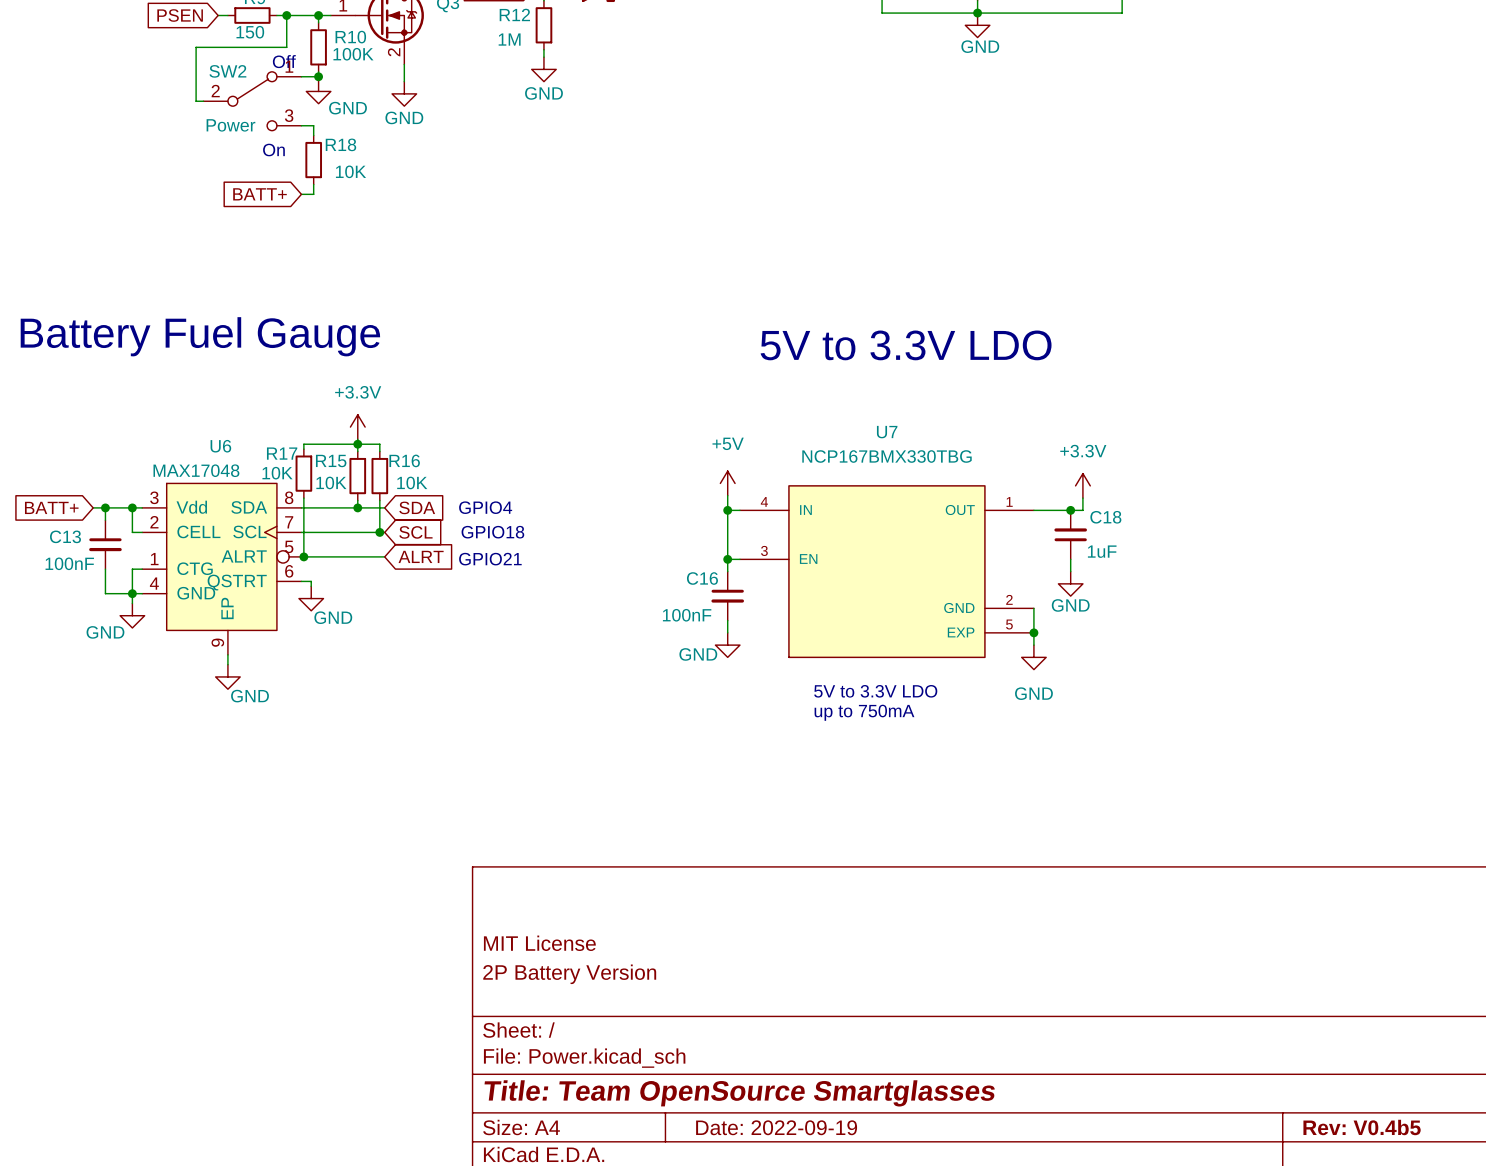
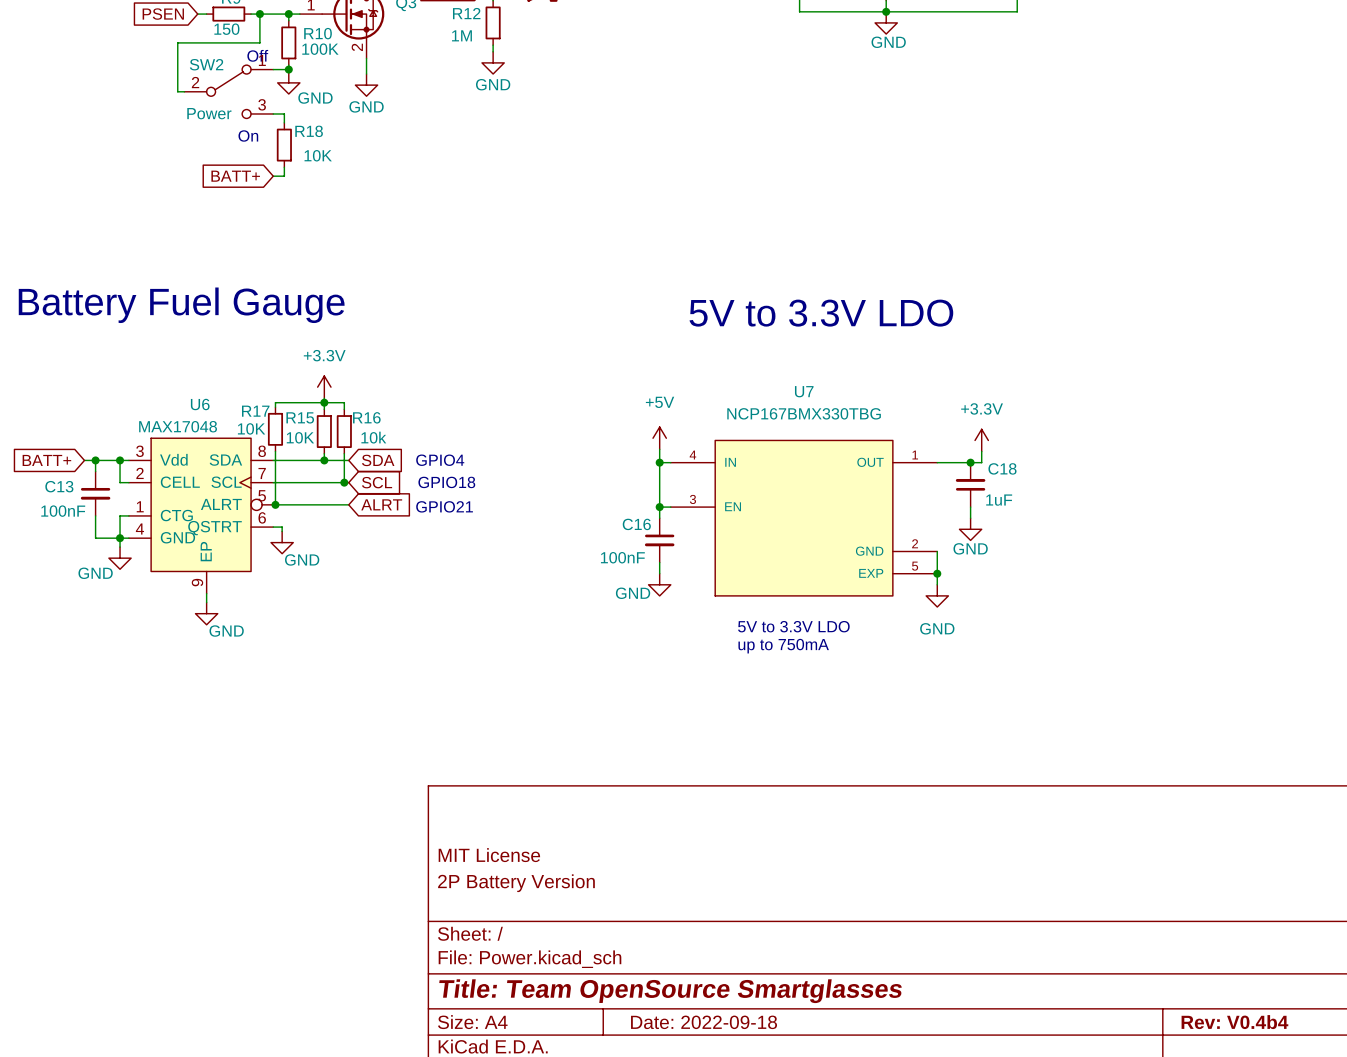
R16 value: 10K (412, 482) -> 10k (373, 437)
title block: Date: 2022-09-19 (776, 1127) -> Date: 2022-09-18 (704, 1022)
title block: Rev: V0.4b5 (1362, 1127) -> Rev: V0.4b4 (1234, 1022)

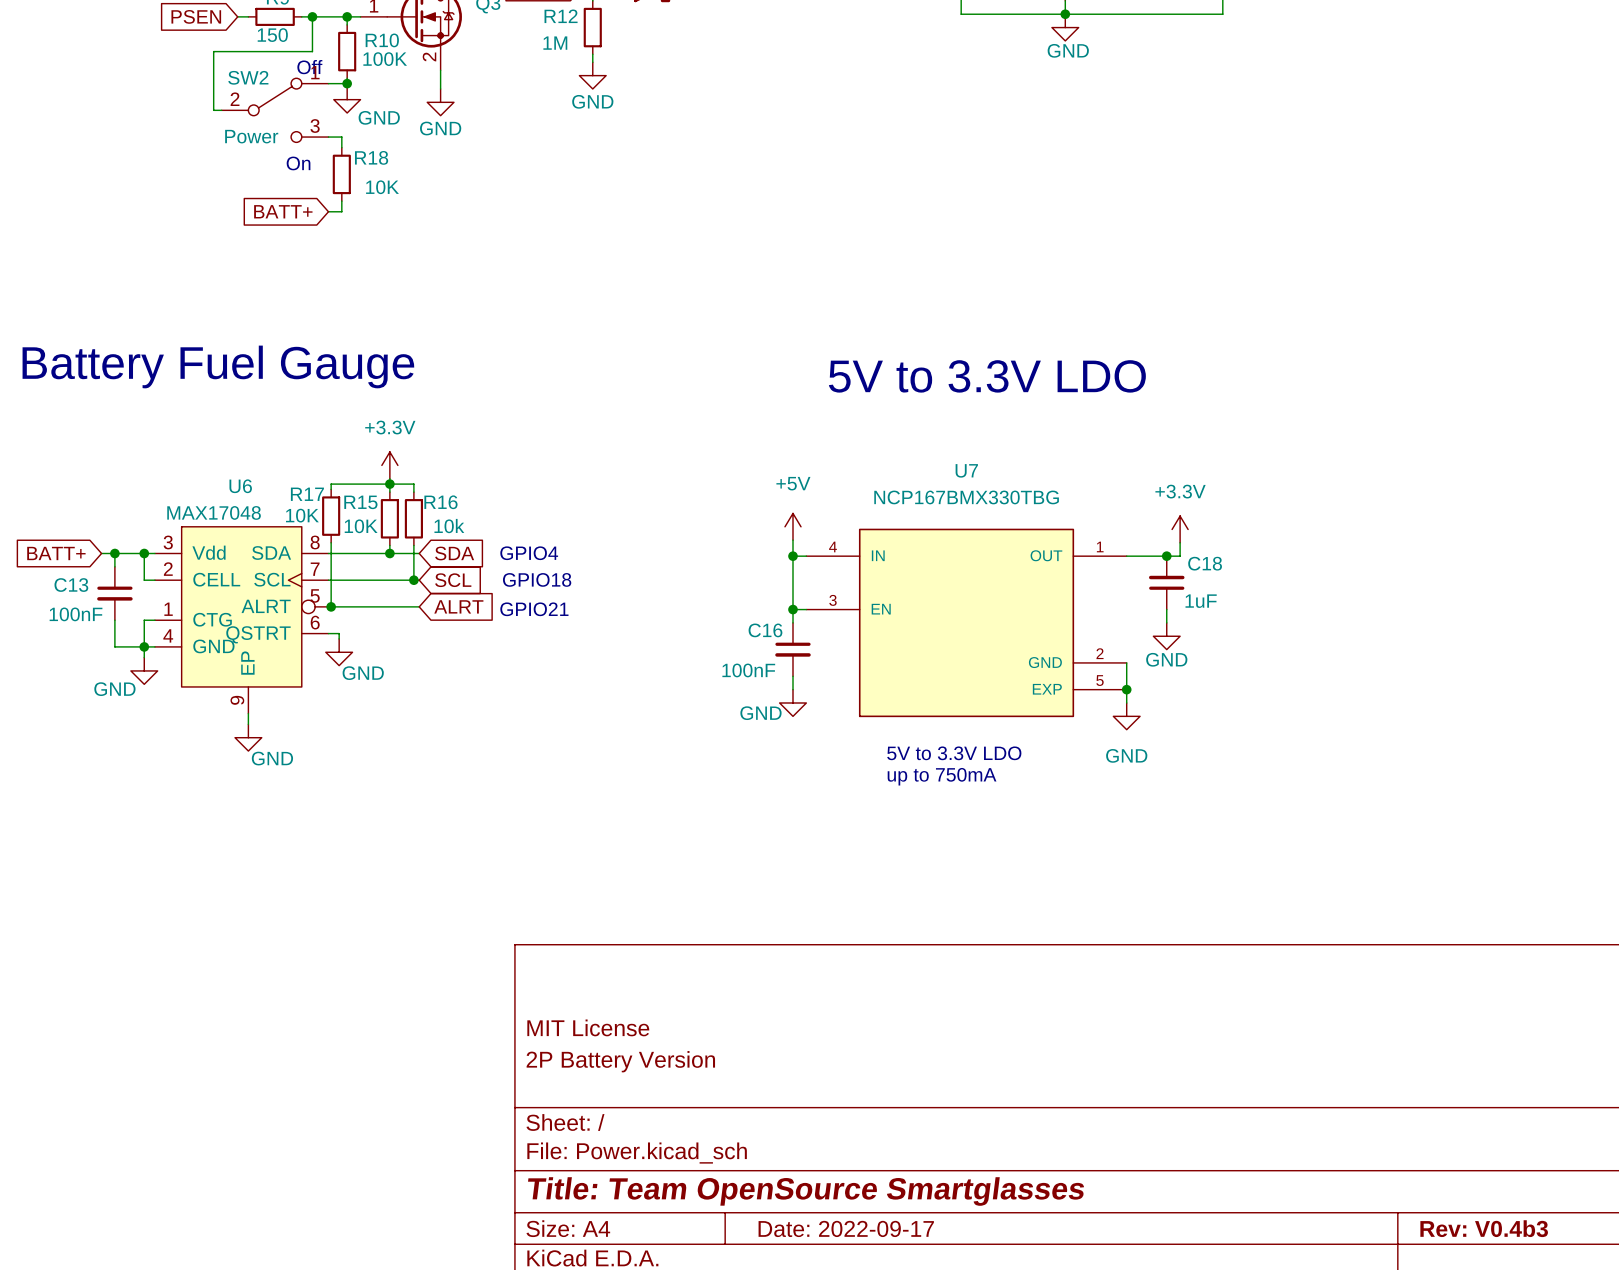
title block: Date: 2022-09-18 (704, 1022) -> Date: 2022-09-17 (846, 1228)
title block: Rev: V0.4b4 (1234, 1022) -> Rev: V0.4b3 (1484, 1228)

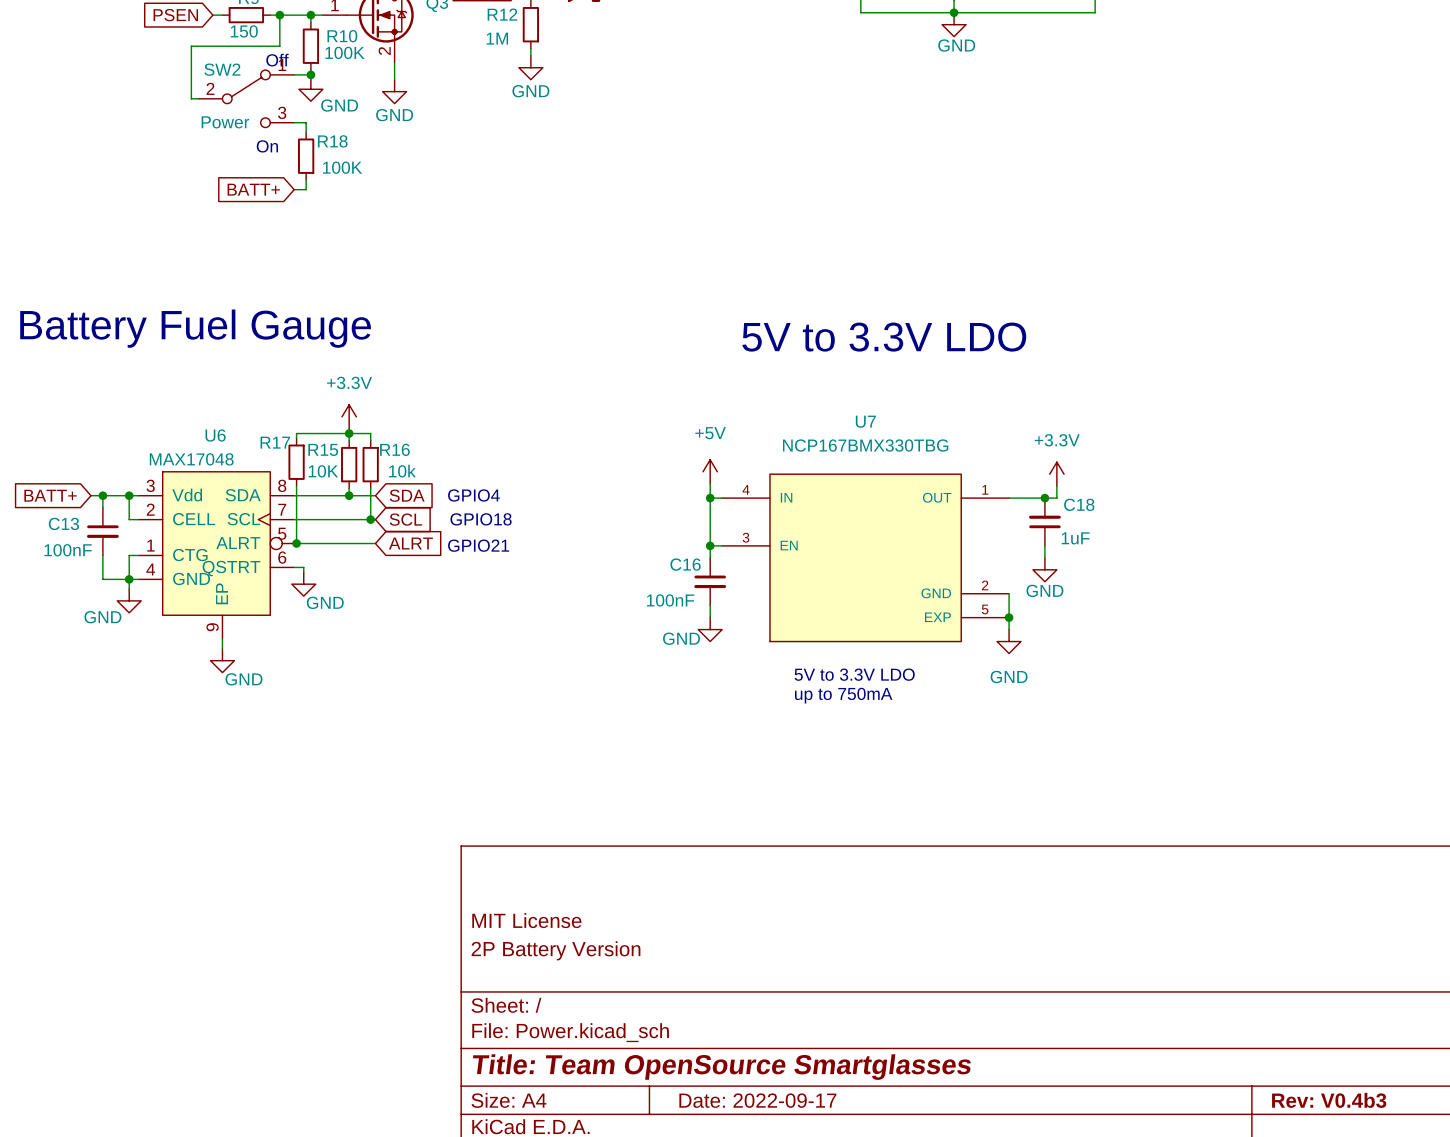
R18 value: 10K (382, 187) -> 100K (342, 167)
R17 value: 10K (302, 515) -> none

